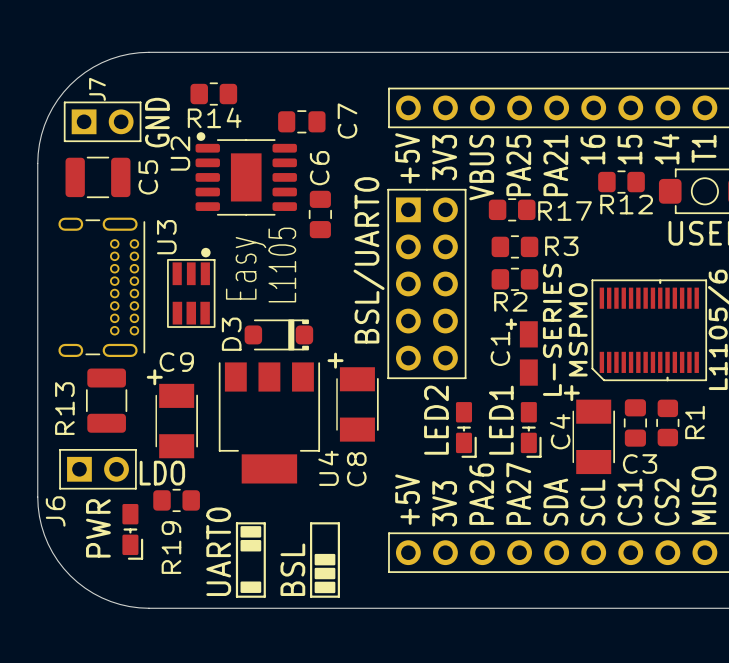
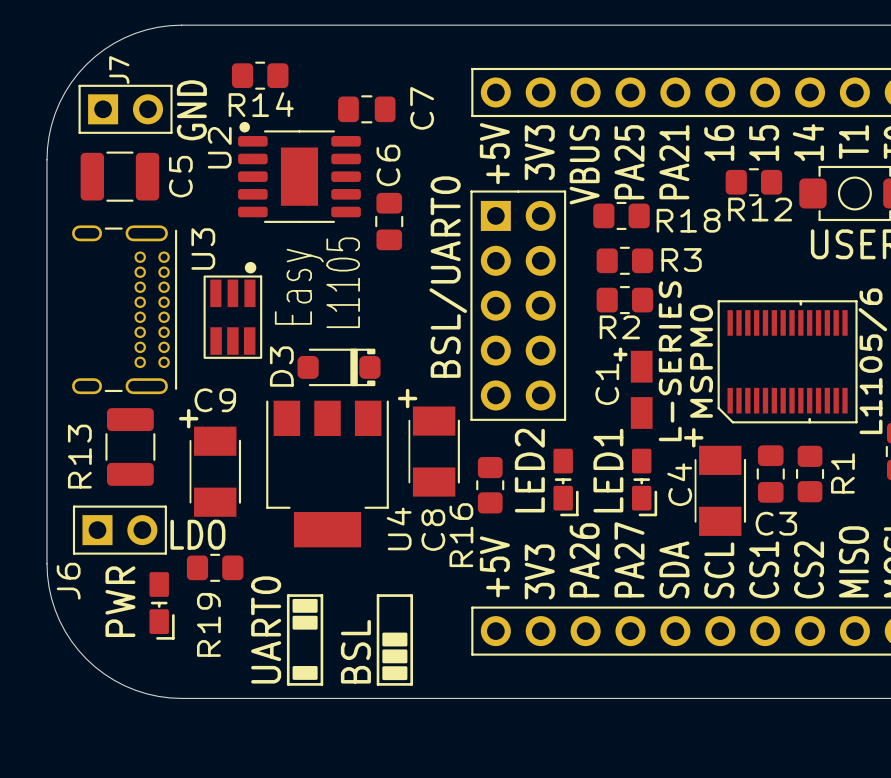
R17 name: R17 (565, 211) -> R18 (688, 220)
R16: none -> (490, 485)

